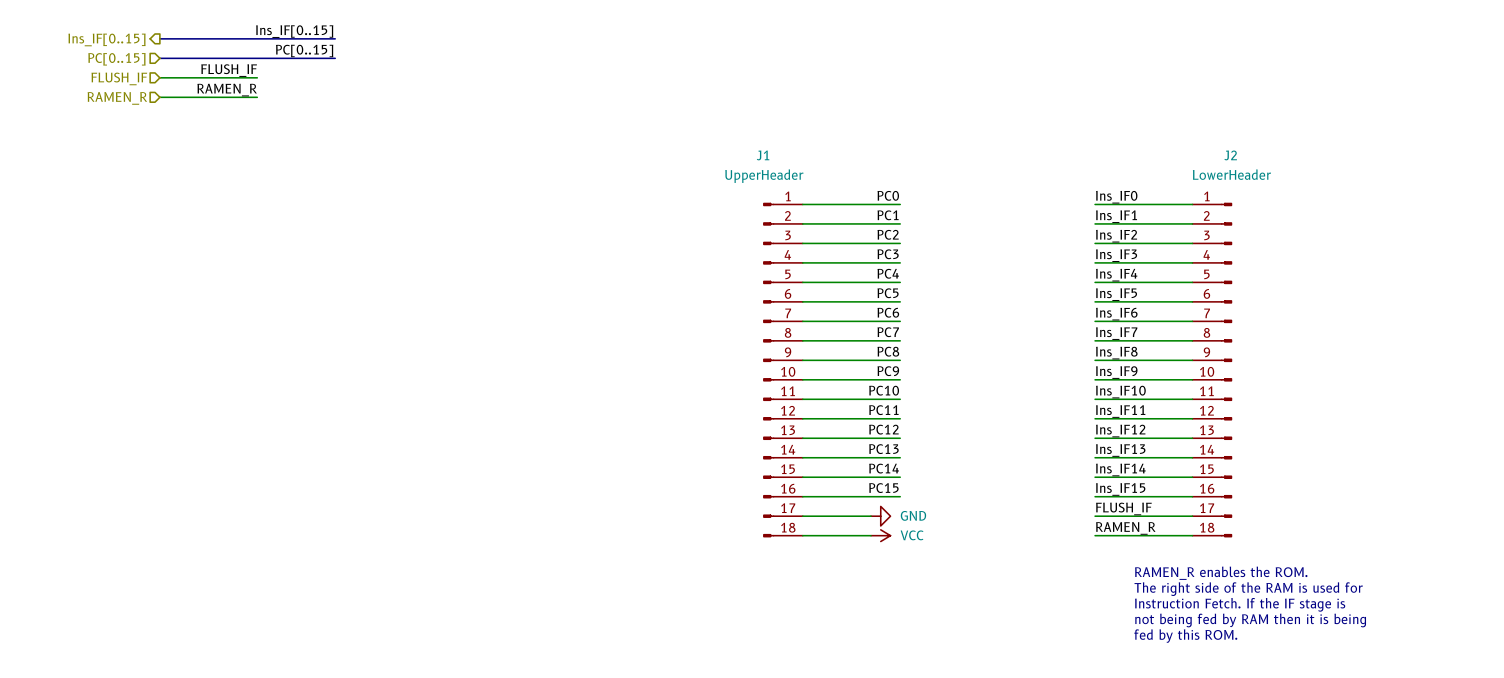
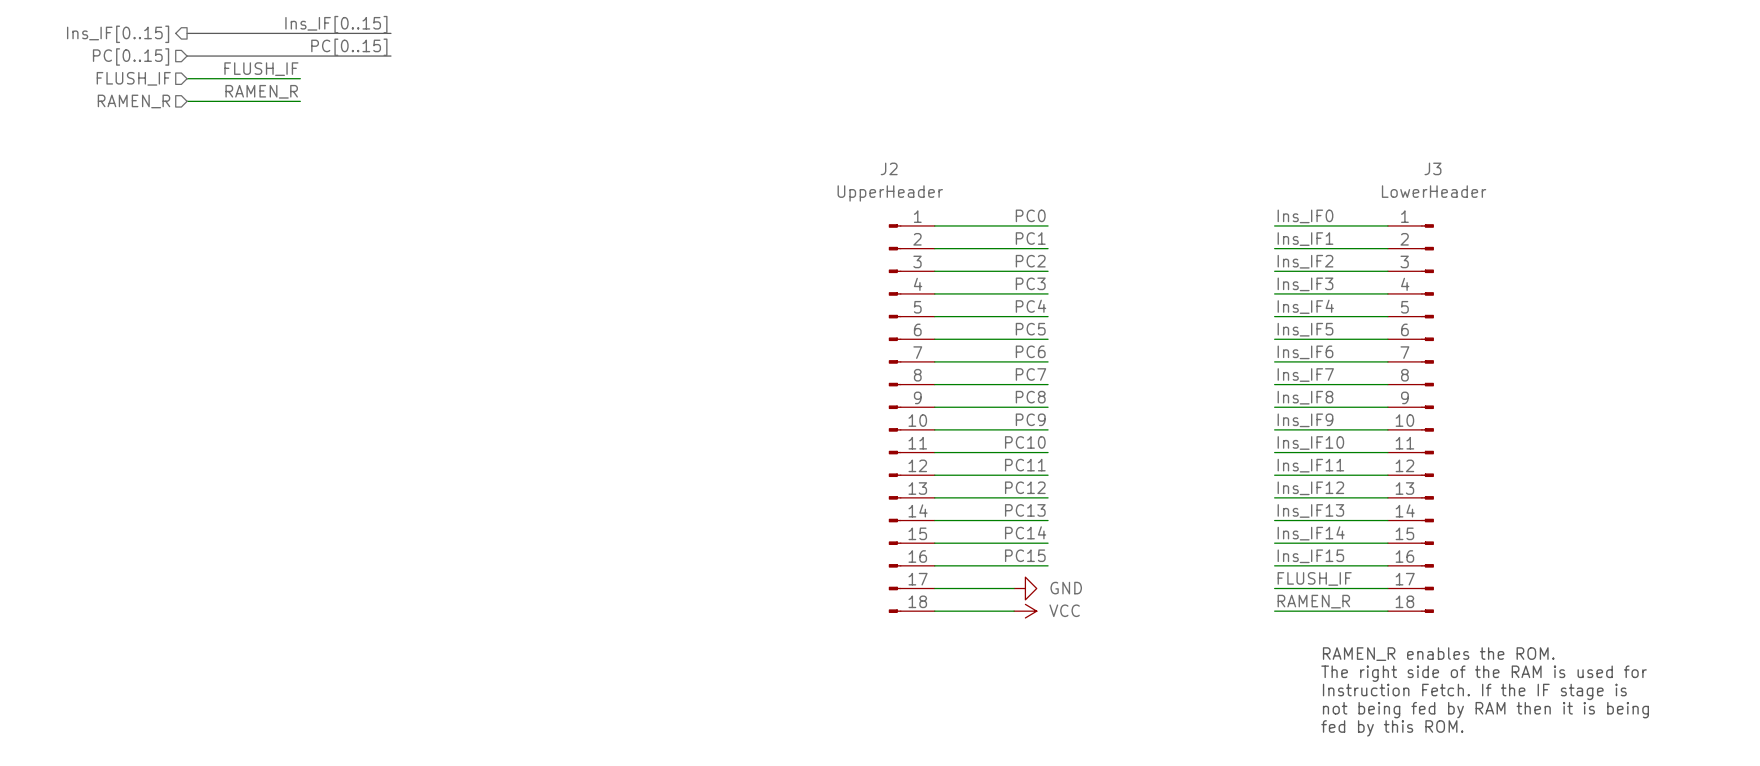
J1 name: J1 (763, 155) -> J2 (889, 168)
J2 name: J2 (1230, 155) -> J3 (1432, 168)

